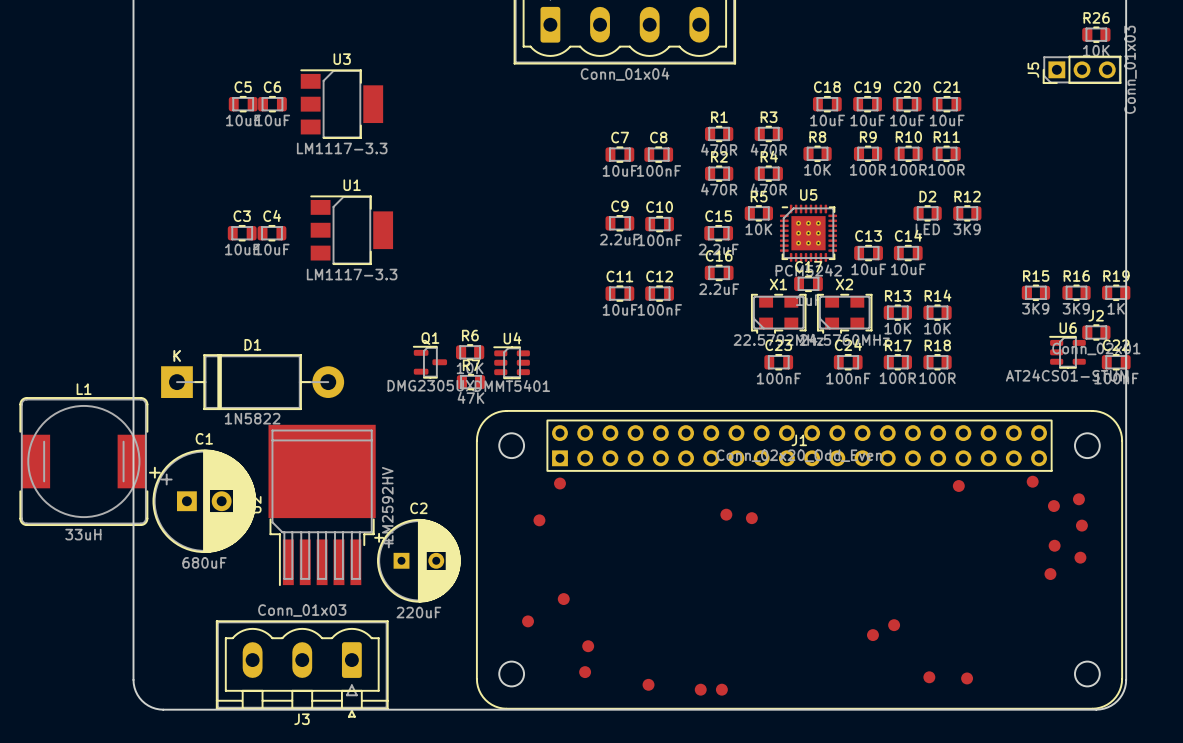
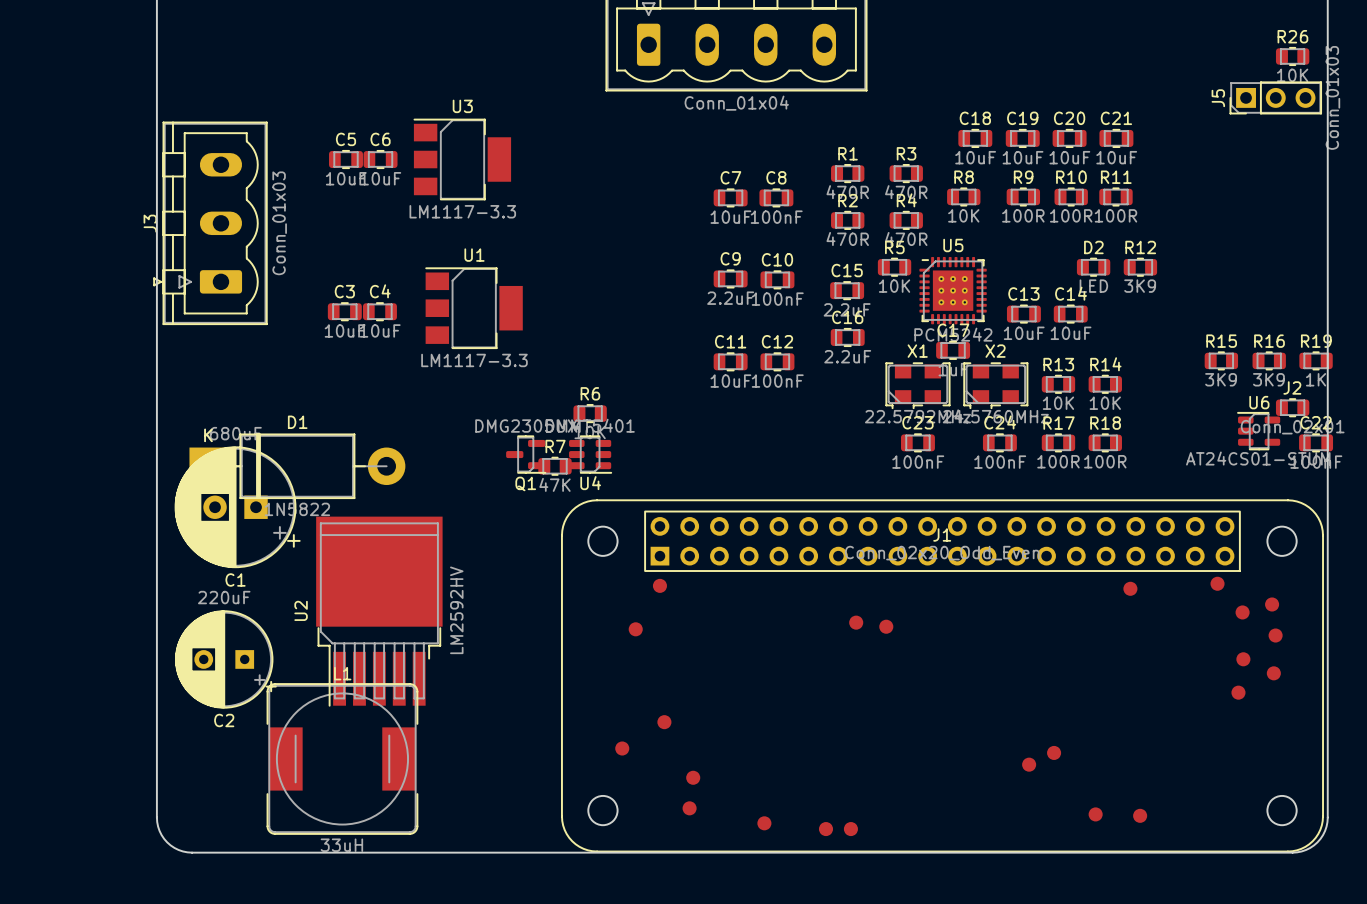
C5 position: (243, 104) -> (346, 159)
C6 position: (272, 104) -> (380, 159)
U3 position: (341, 104) -> (462, 159)
U1 position: (351, 230) -> (474, 308)
C3 position: (242, 233) -> (344, 311)
C4 position: (271, 233) -> (379, 311)
R6 position: (470, 352) -> (590, 413)
Q1 rotation: 0° (430, 362) -> 180° (526, 454)
U4 rotation: 0° (511, 362) -> 180° (590, 454)
L1 position: (83, 461) -> (342, 758)
C1 rotation: 0° (202, 501) -> 180° (237, 507)
C1 position: (202, 501) -> (237, 507)
C2 rotation: 0° (417, 560) -> 180° (225, 659)
C2 position: (417, 560) -> (225, 659)
J3 rotation: 0° (302, 668) -> 90° clockwise (210, 223)
J3 position: (302, 668) -> (210, 223)

